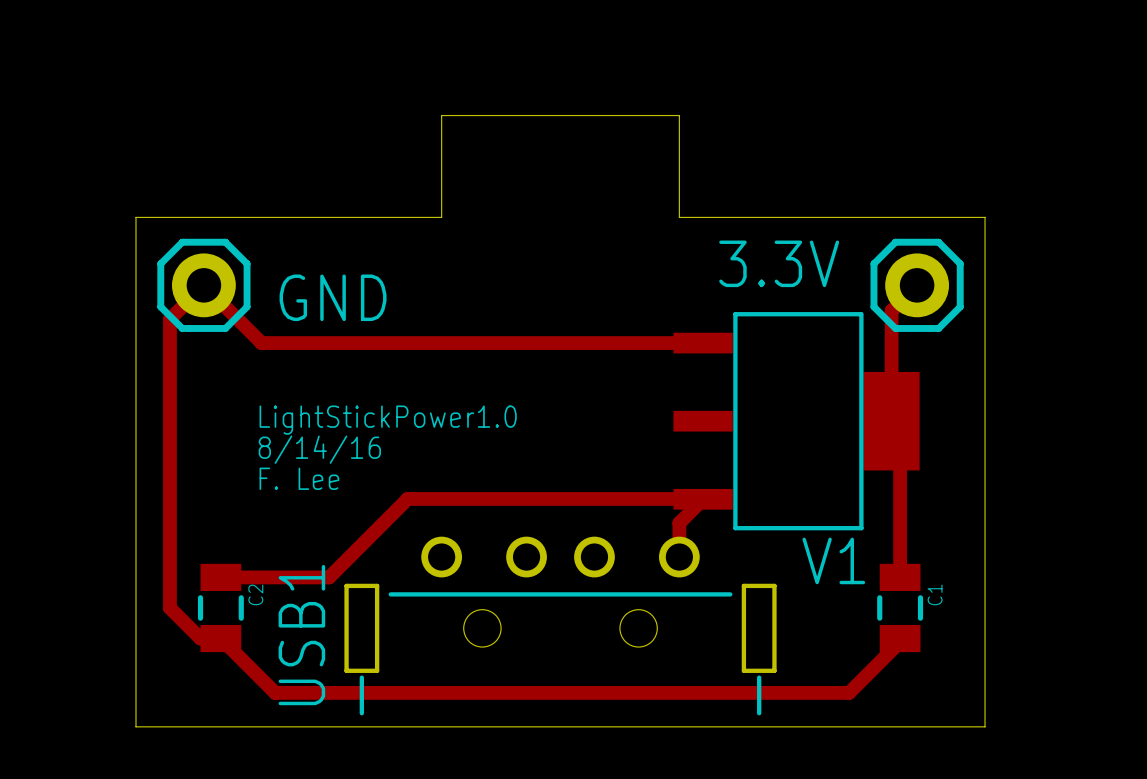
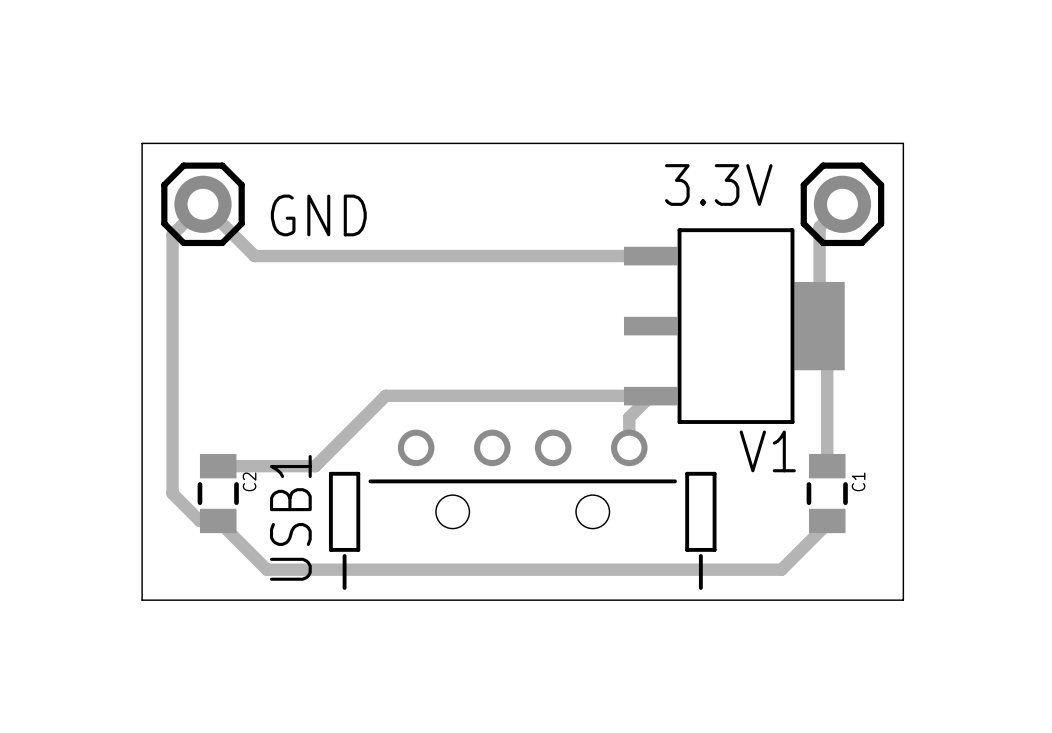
board edge: (441, 217) (441, 115) (679, 115) (679, 217) -> (416, 143) (629, 143)
text: LightStickPower1.0 (388, 420) -> none
text: 8/14/16 (319, 449) -> none
text: F. Lee (299, 478) -> none

